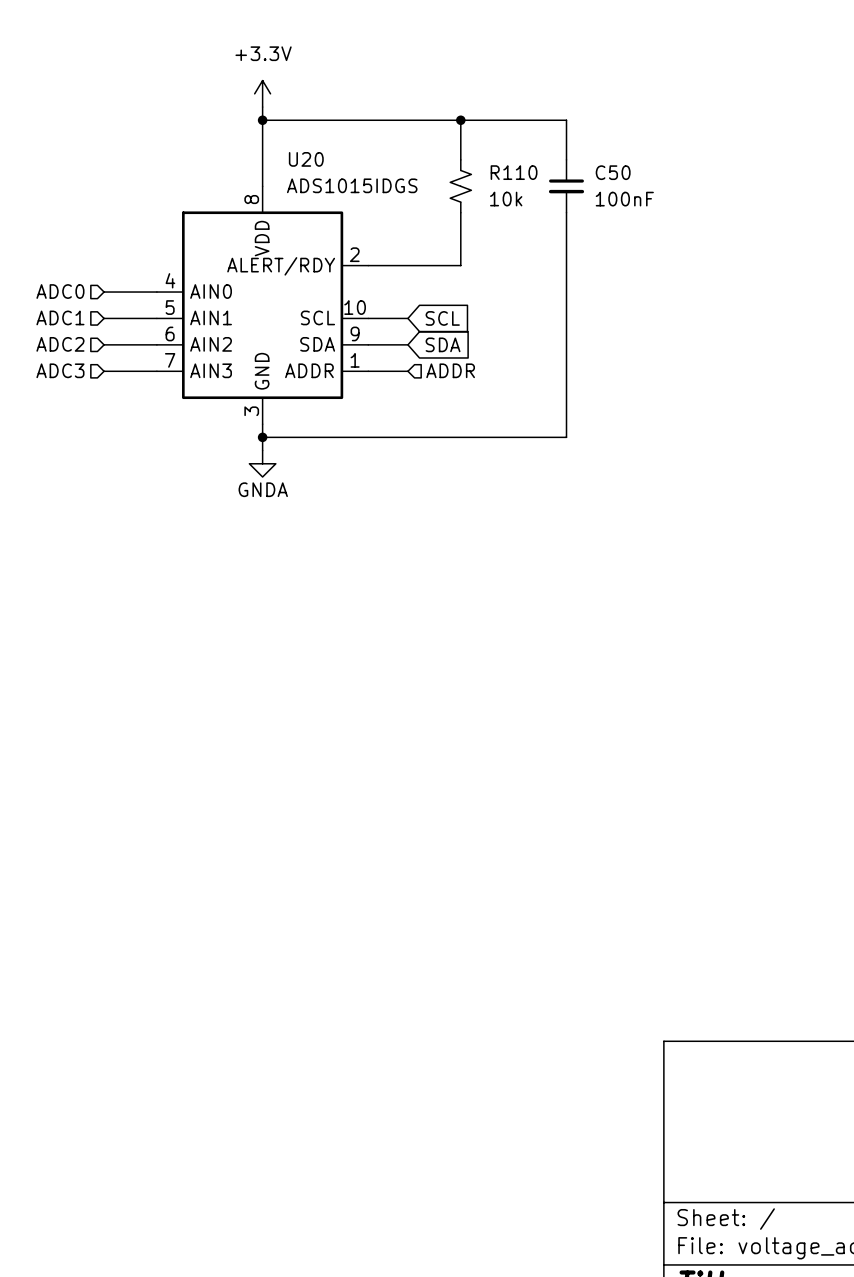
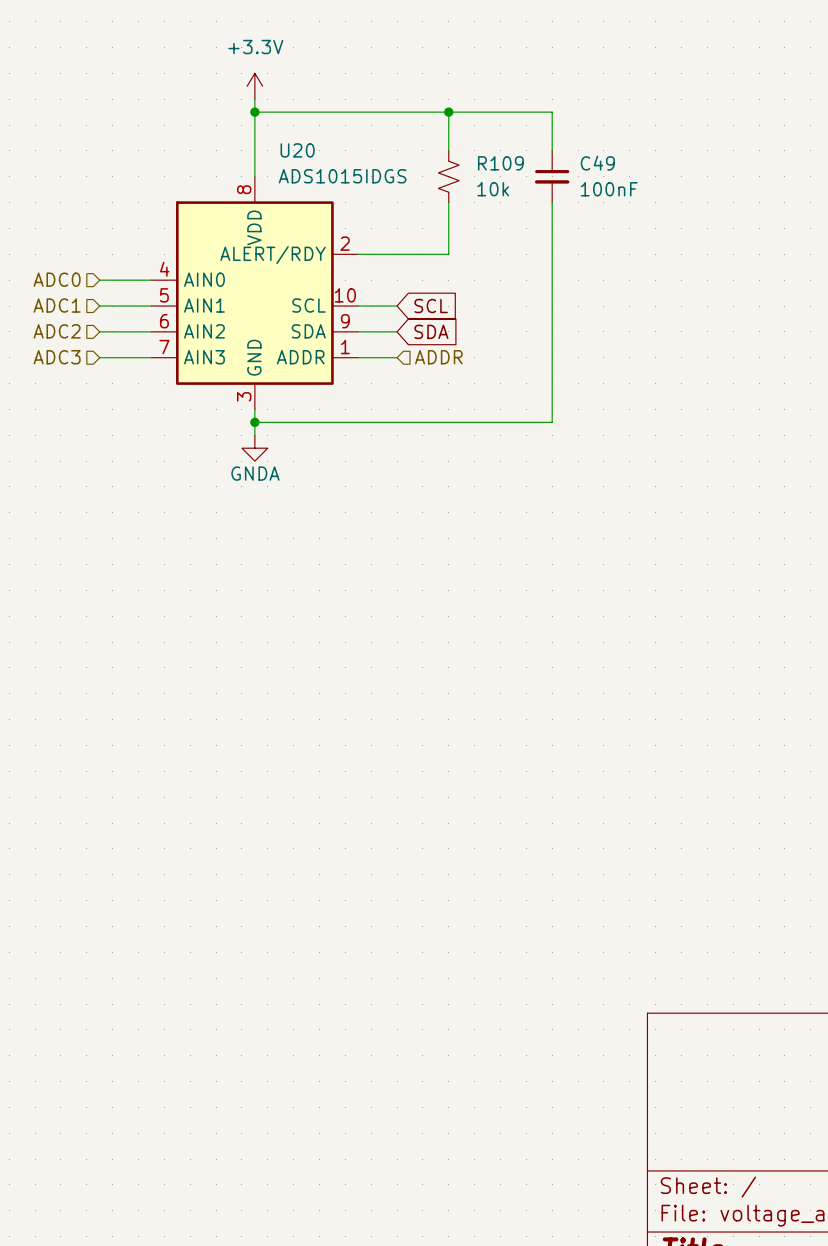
R110 name: R110 (514, 172) -> R109 (500, 163)
C50 name: C50 (613, 172) -> C49 (597, 163)

